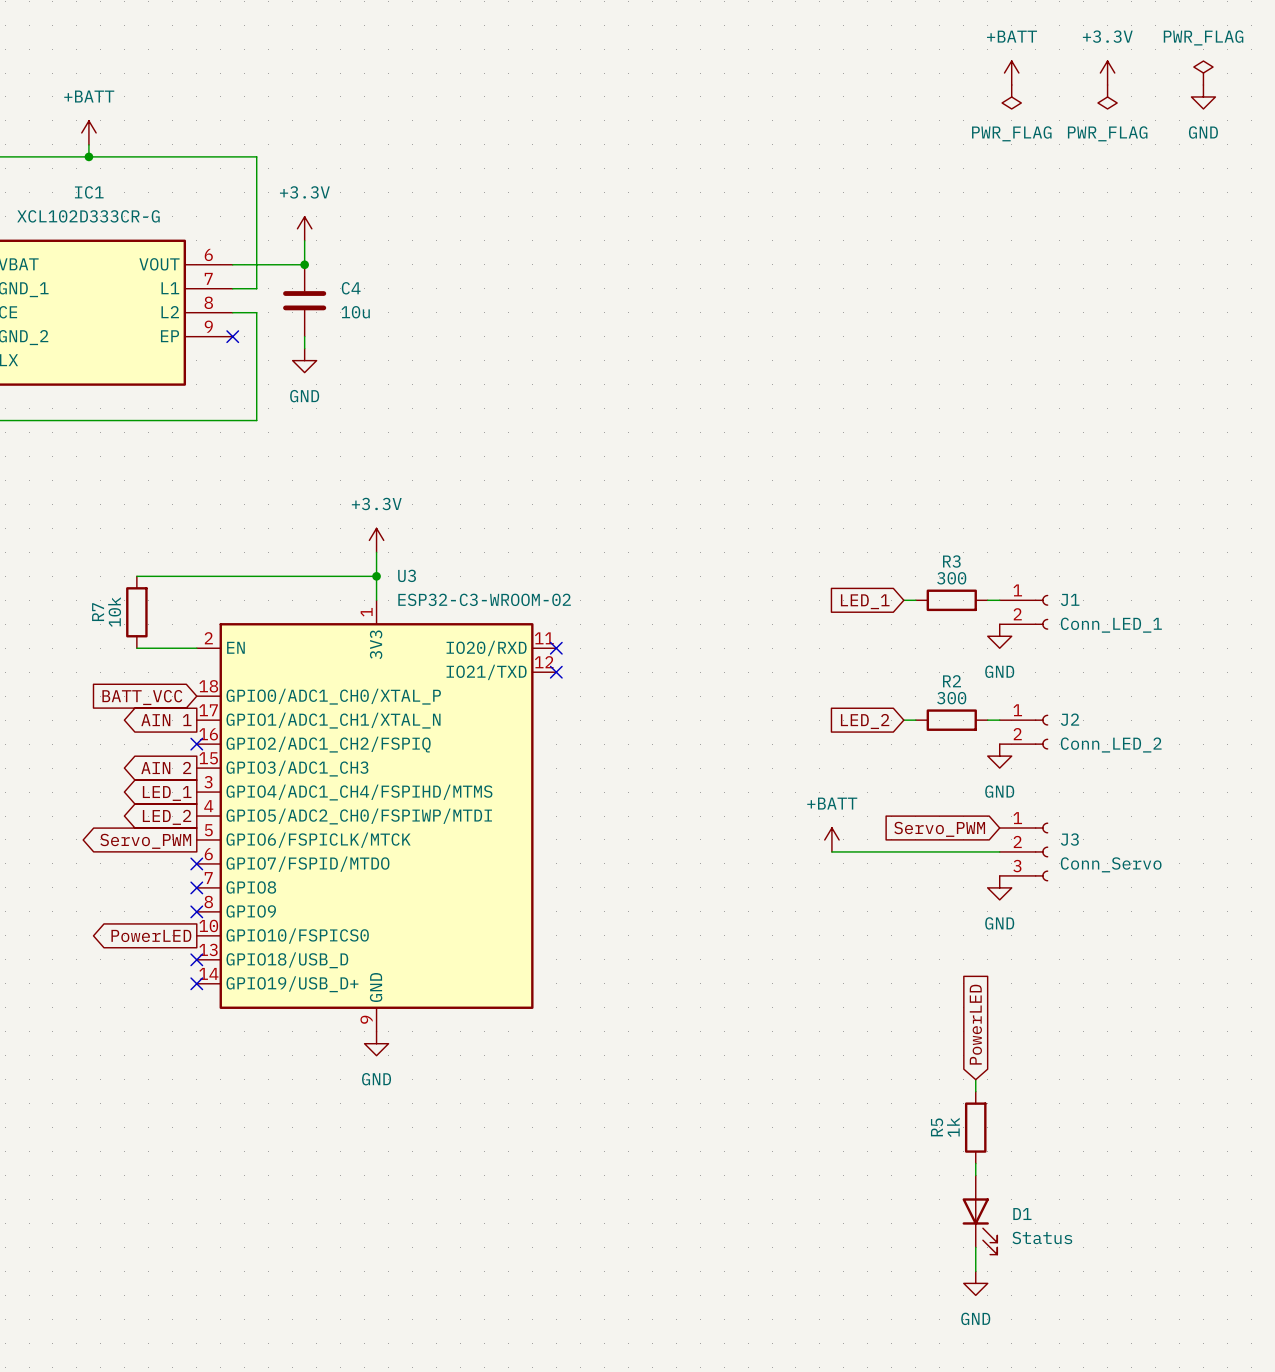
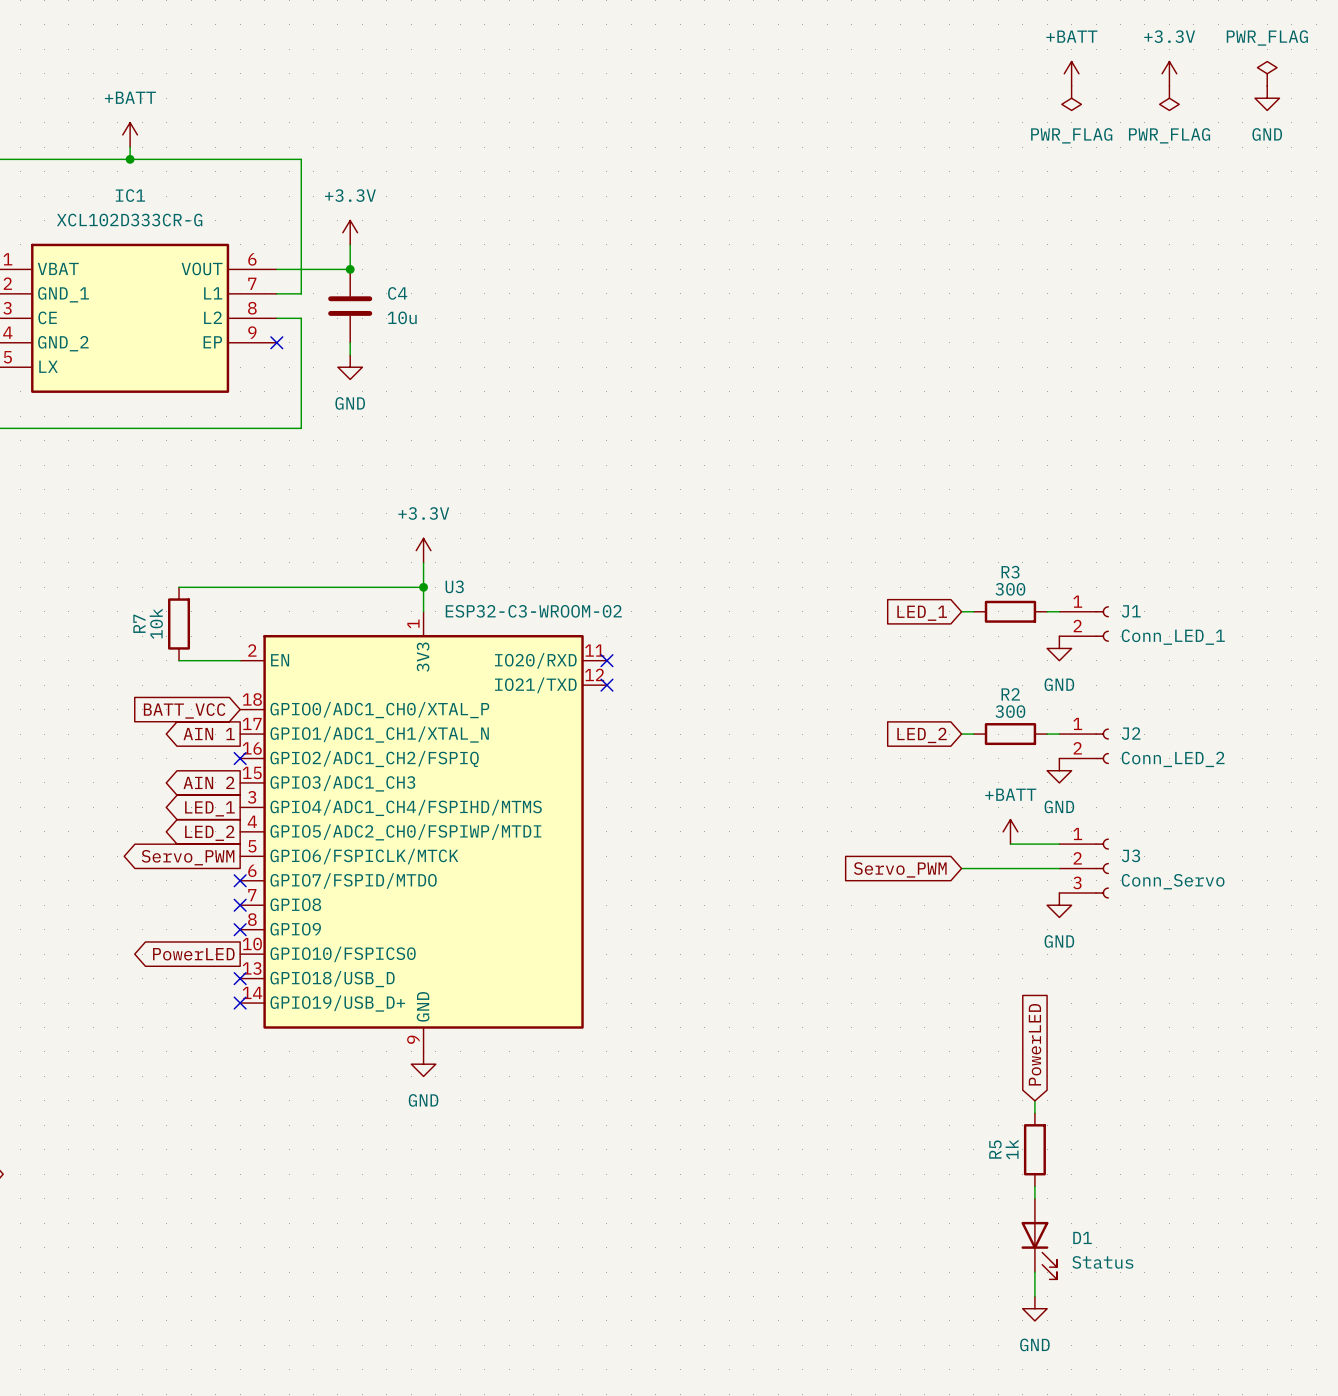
wire: none -> (1010, 844) (1059, 844)
global label position: Servo_PWM (939, 829) -> Servo_PWM (900, 869)
power symbol position: +BATT (831, 839) -> +BATT (1010, 831)
wire: (831, 851) (903, 851) -> none

